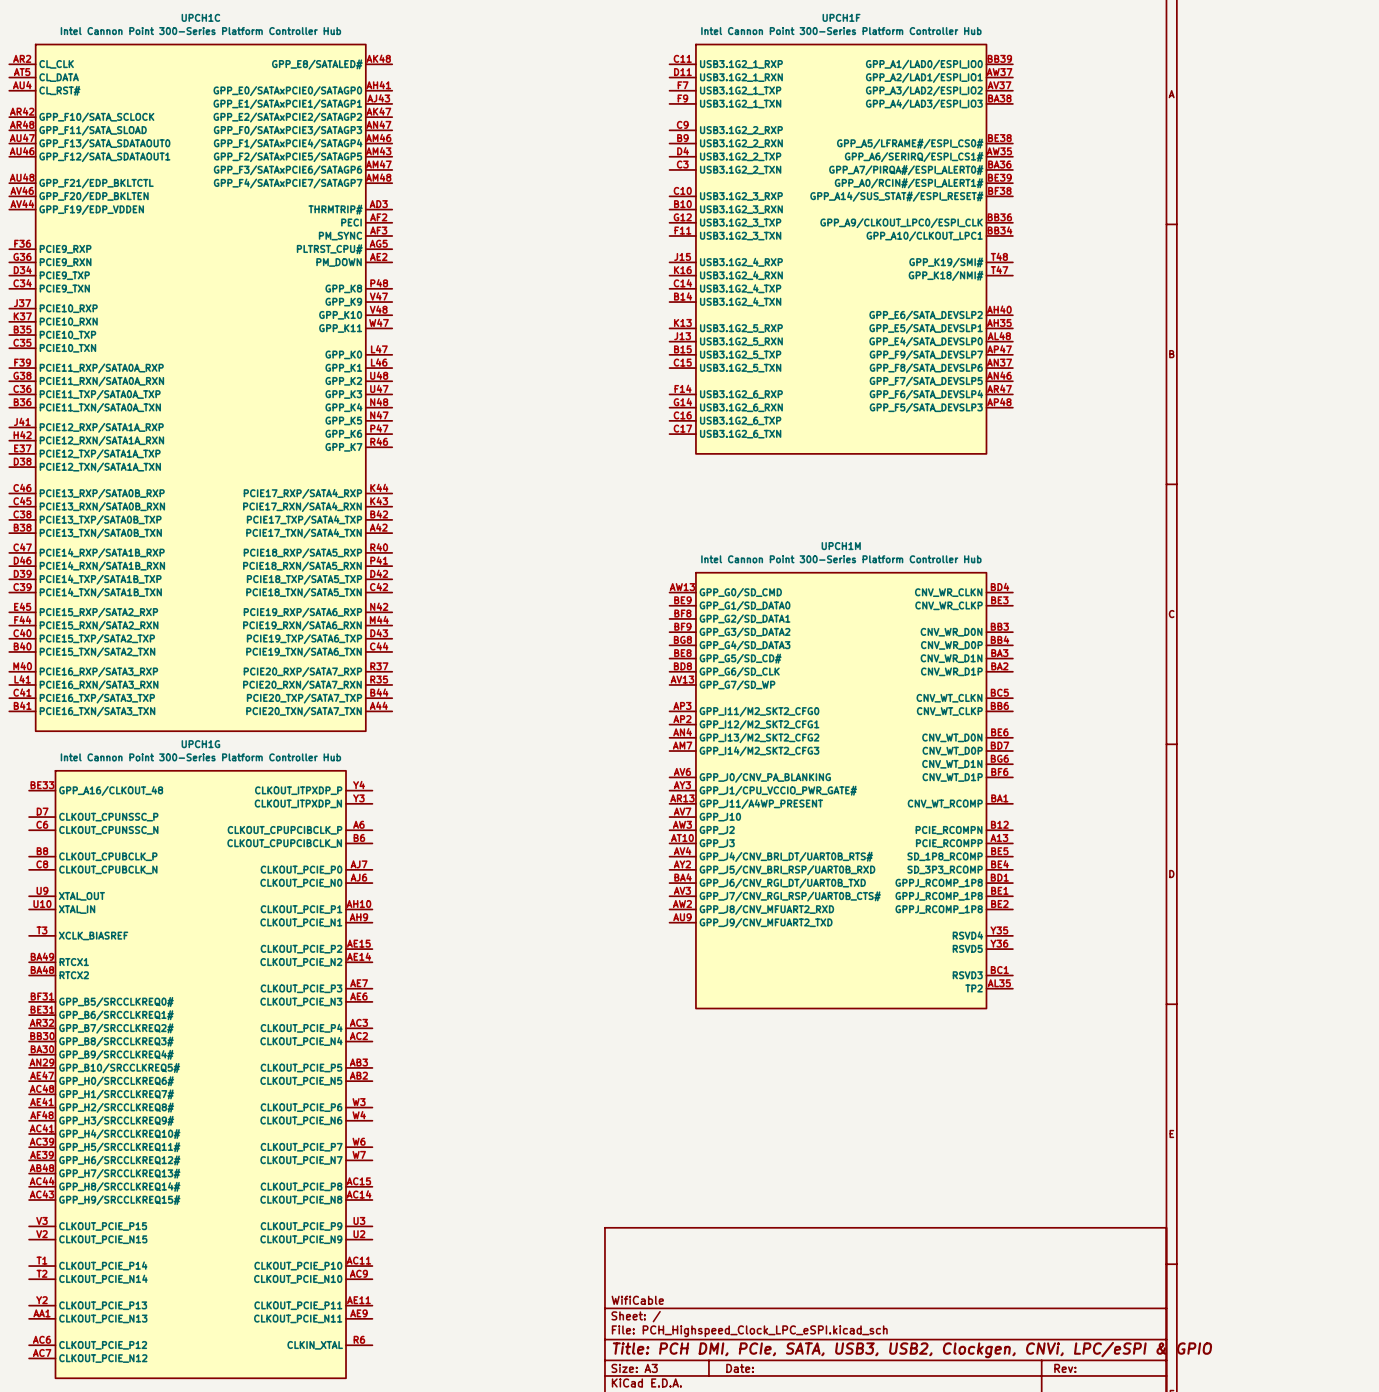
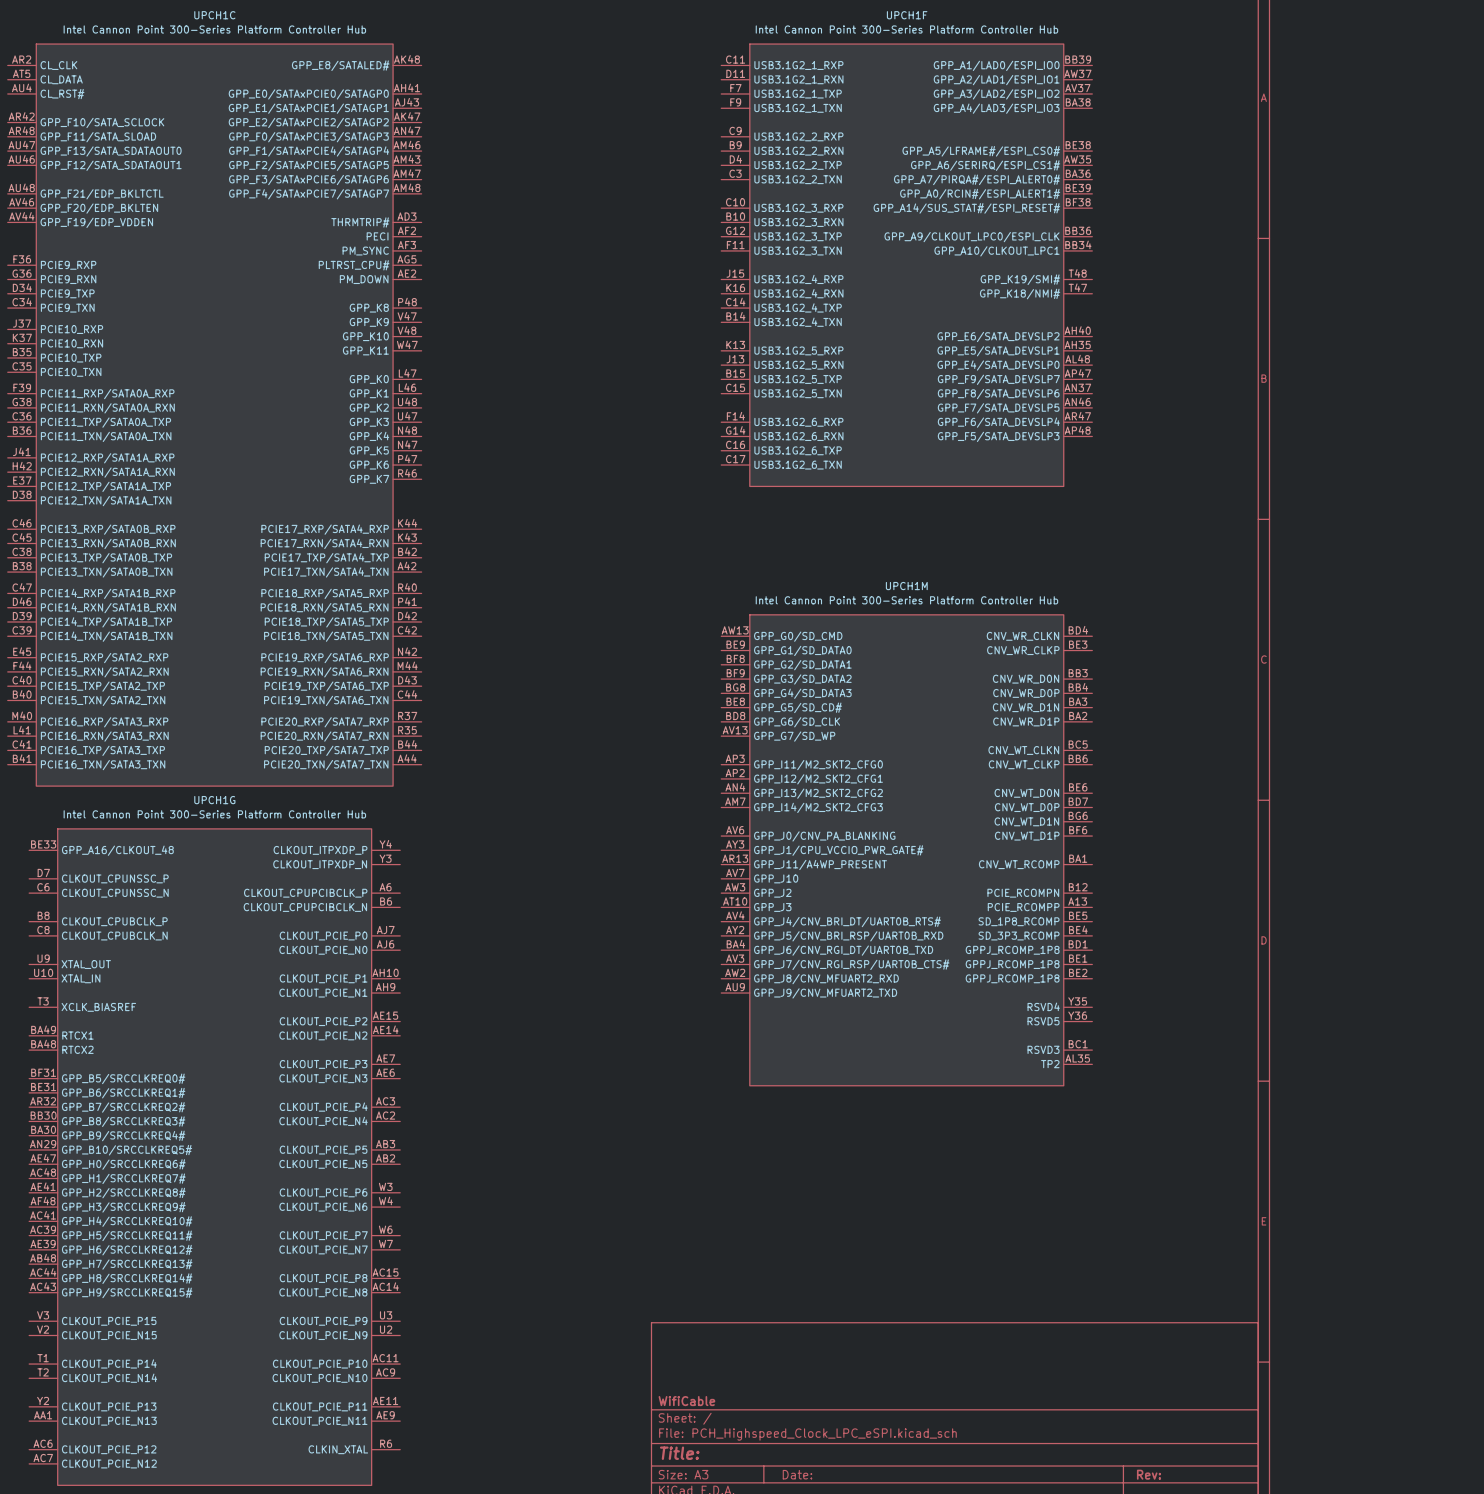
title block: Title: PCH DMI, PCIe, SATA, USB3, USB2, Clockgen, CNVi, LPC/eSPI & GPIO (912, 1350) -> Title: (679, 1453)

